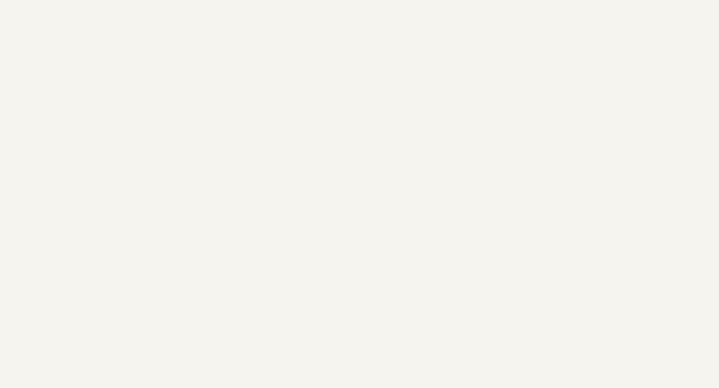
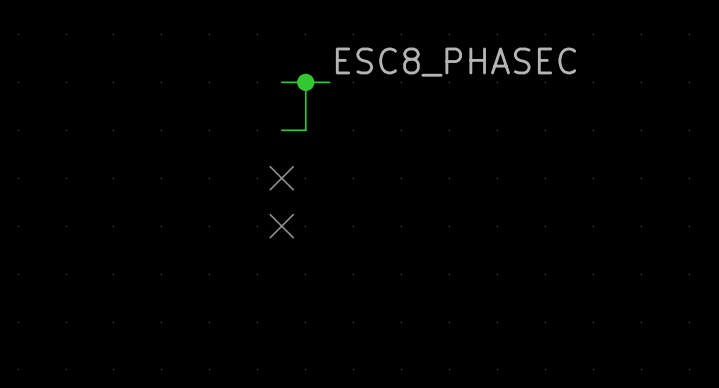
label: none -> ESC8_PHASEC (456, 62)
wire: none -> (281, 82) (329, 82)
wire: none -> (305, 82) (305, 130) (281, 130)
junction: none -> (305, 82)
no-connect mark: none -> (281, 178)
no-connect mark: none -> (281, 226)

